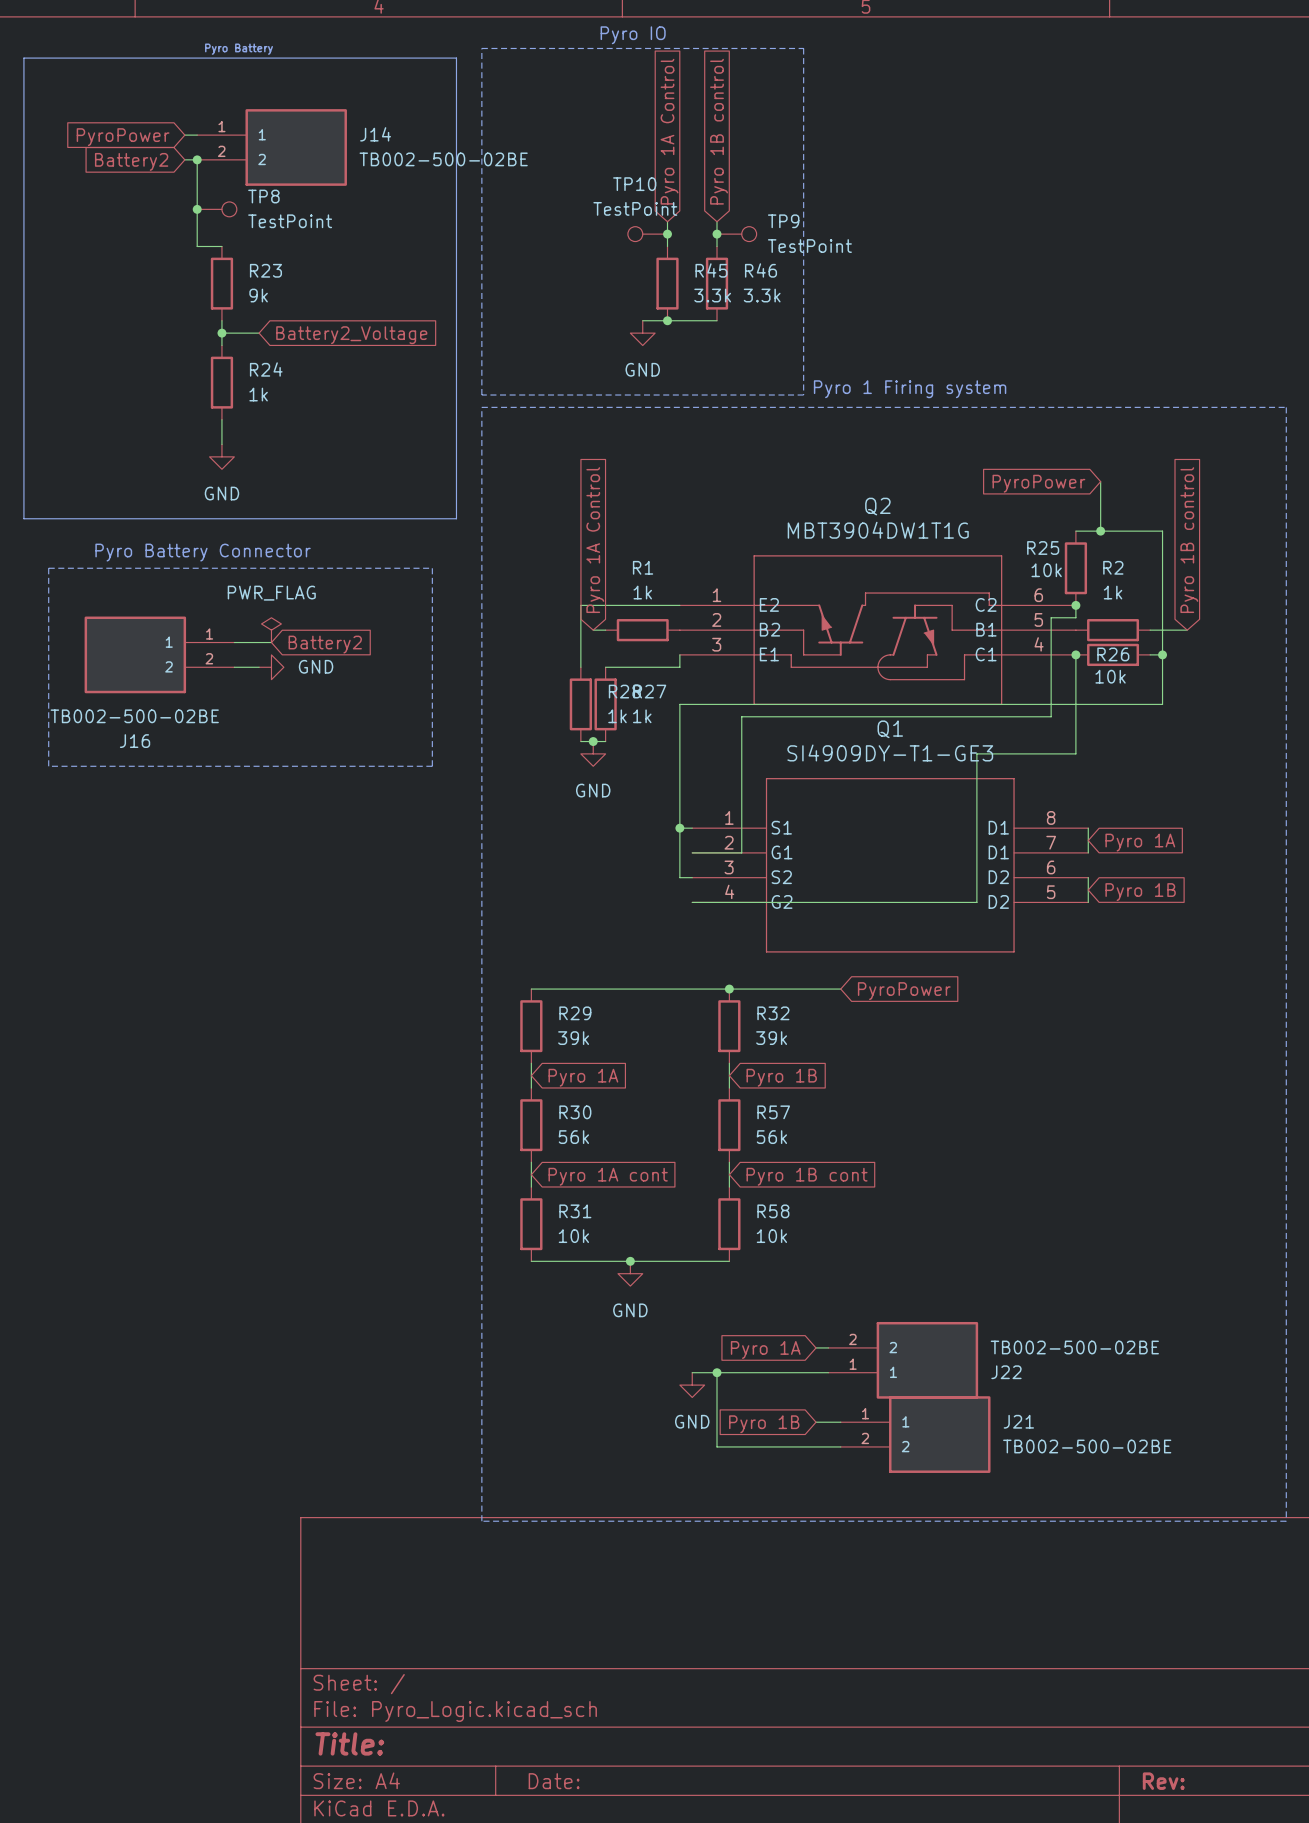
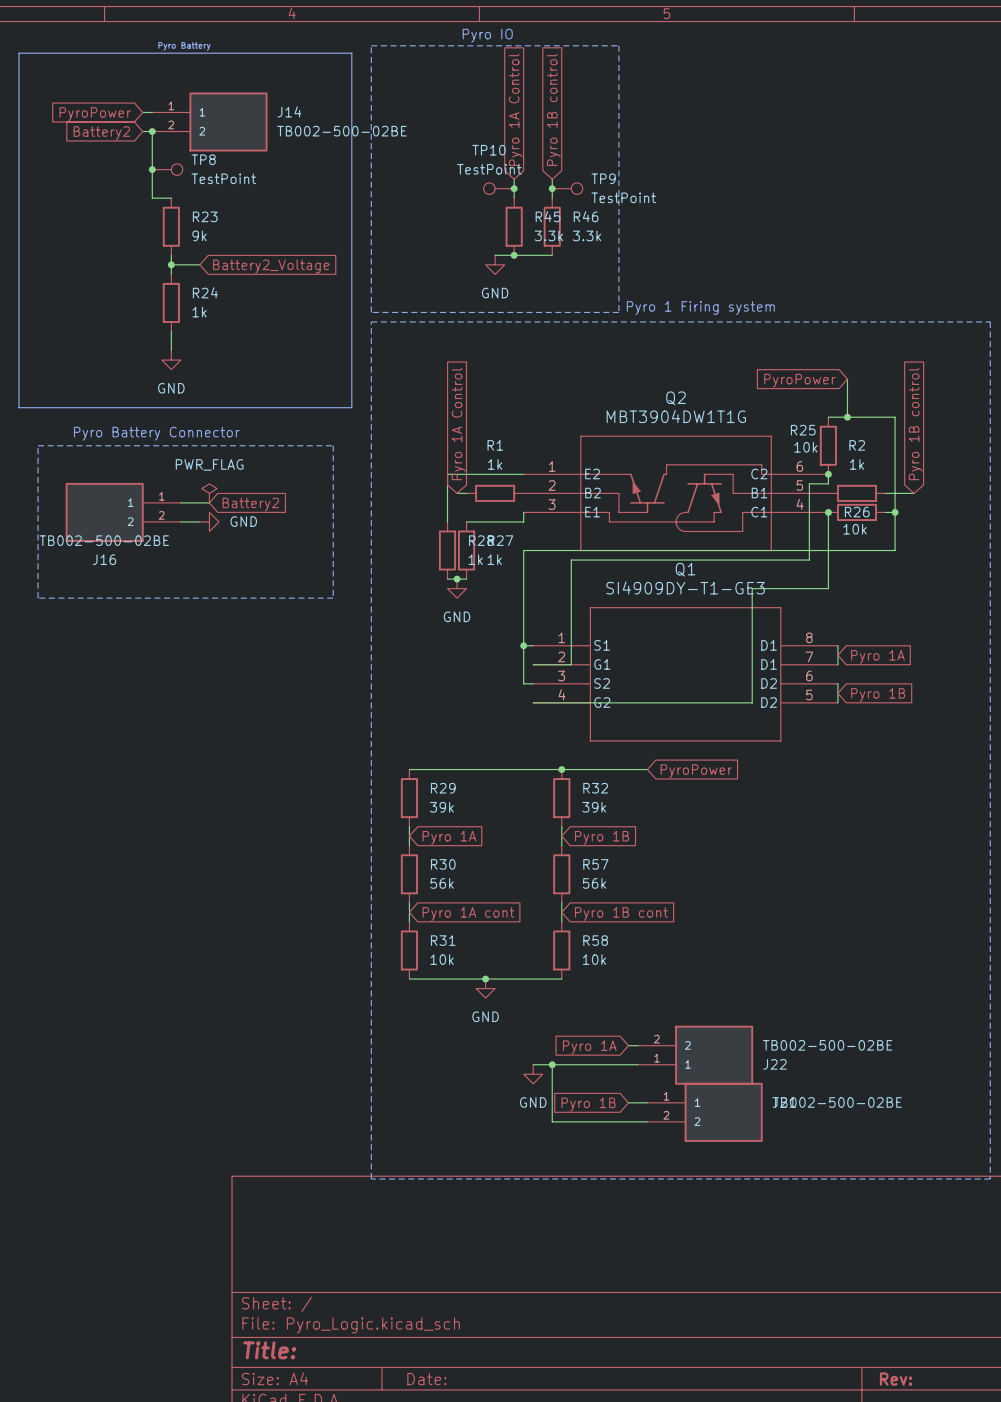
J16 value position: TB002-500-02BE (134, 716) -> TB002-500-02BE (104, 540)
J16 name position: J16 (135, 741) -> J16 (104, 559)
J21 value position: TB002-500-02BE (1087, 1446) -> TB002-500-02BE (837, 1102)

